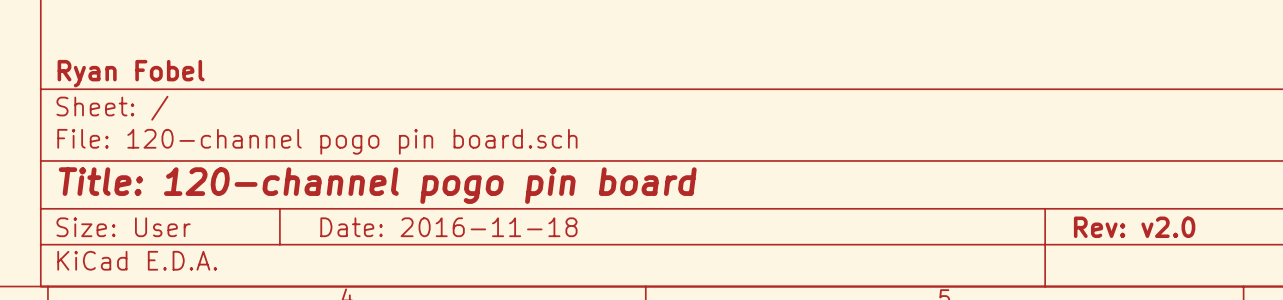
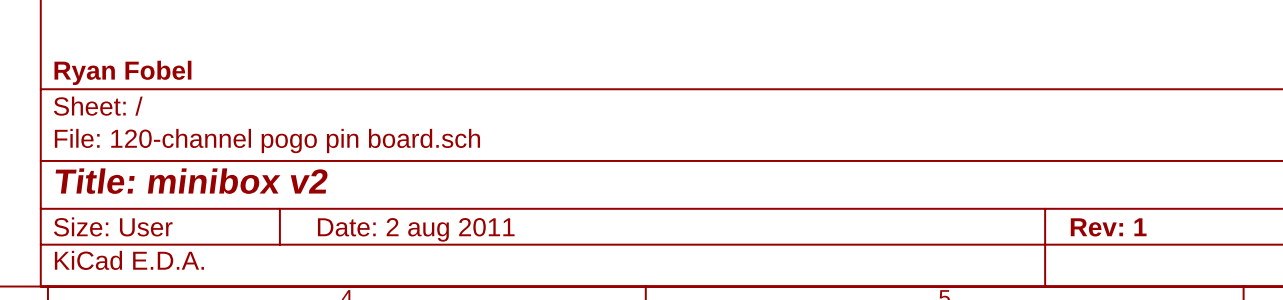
title block: Title: 120-channel pogo pin board (377, 185) -> Title: minibox v2 (191, 181)
title block: Date: 2016-11-18 (448, 227) -> Date: 2 aug 2011 (416, 229)
title block: Rev: v2.0 (1134, 227) -> Rev: 1 (1108, 227)

